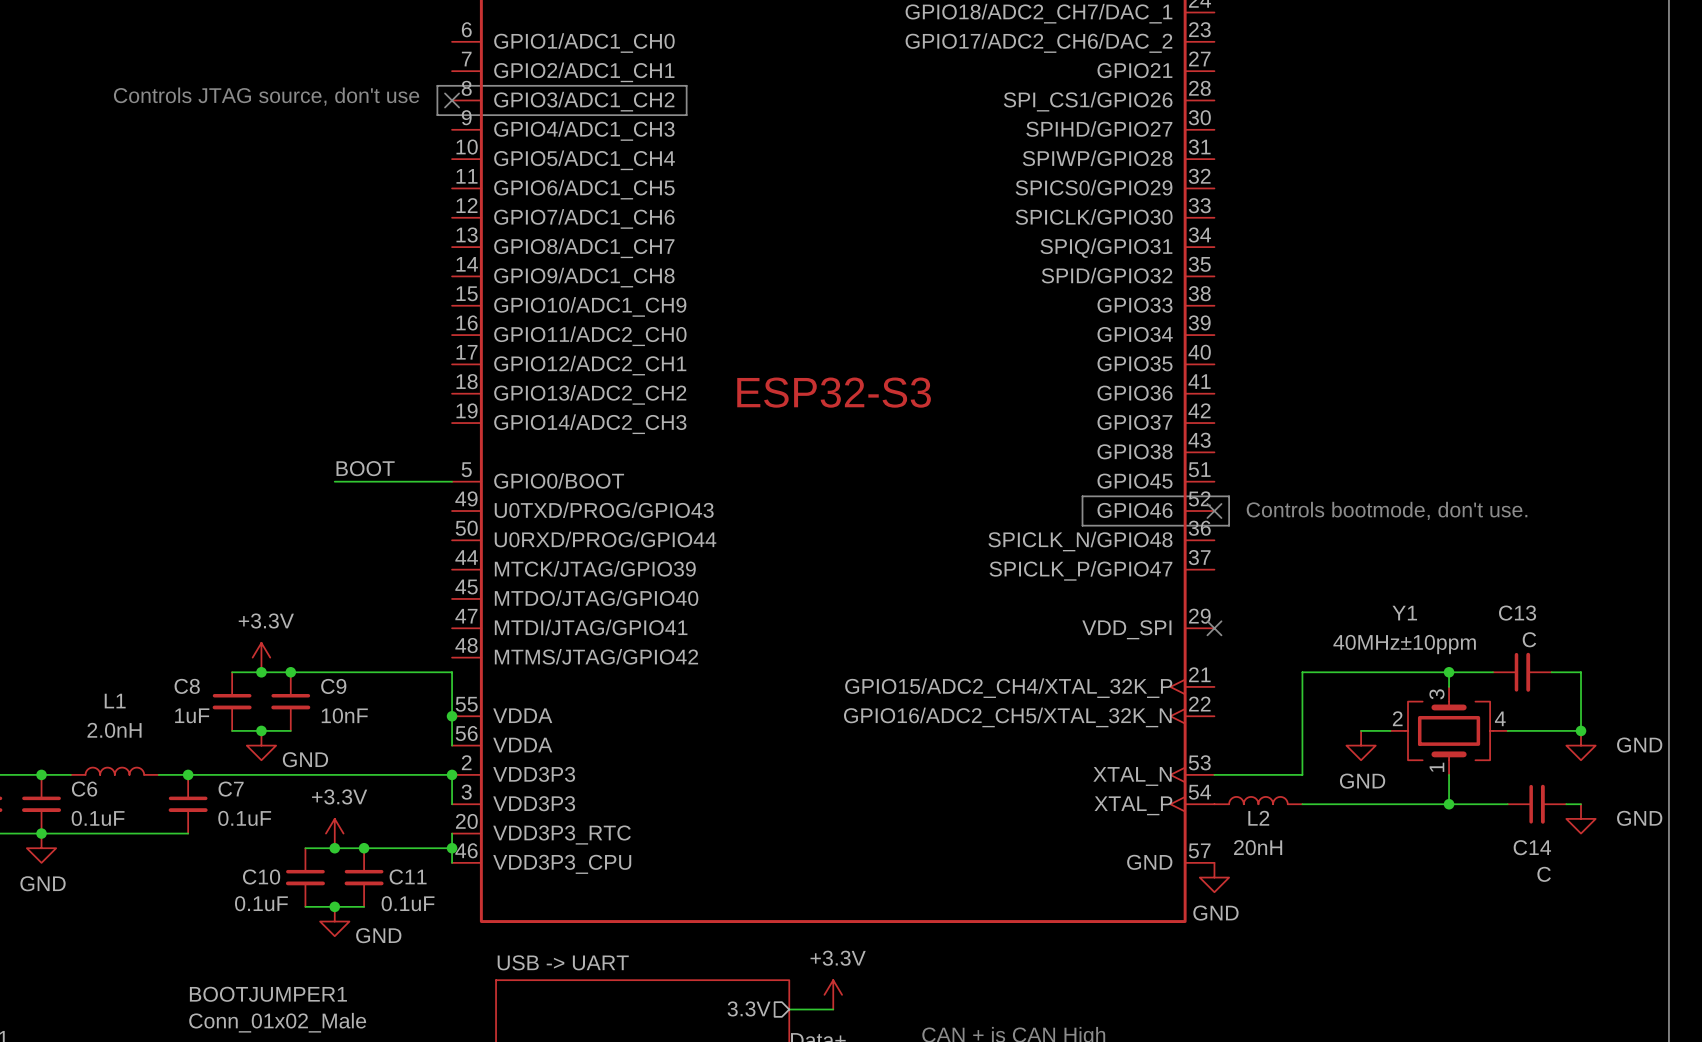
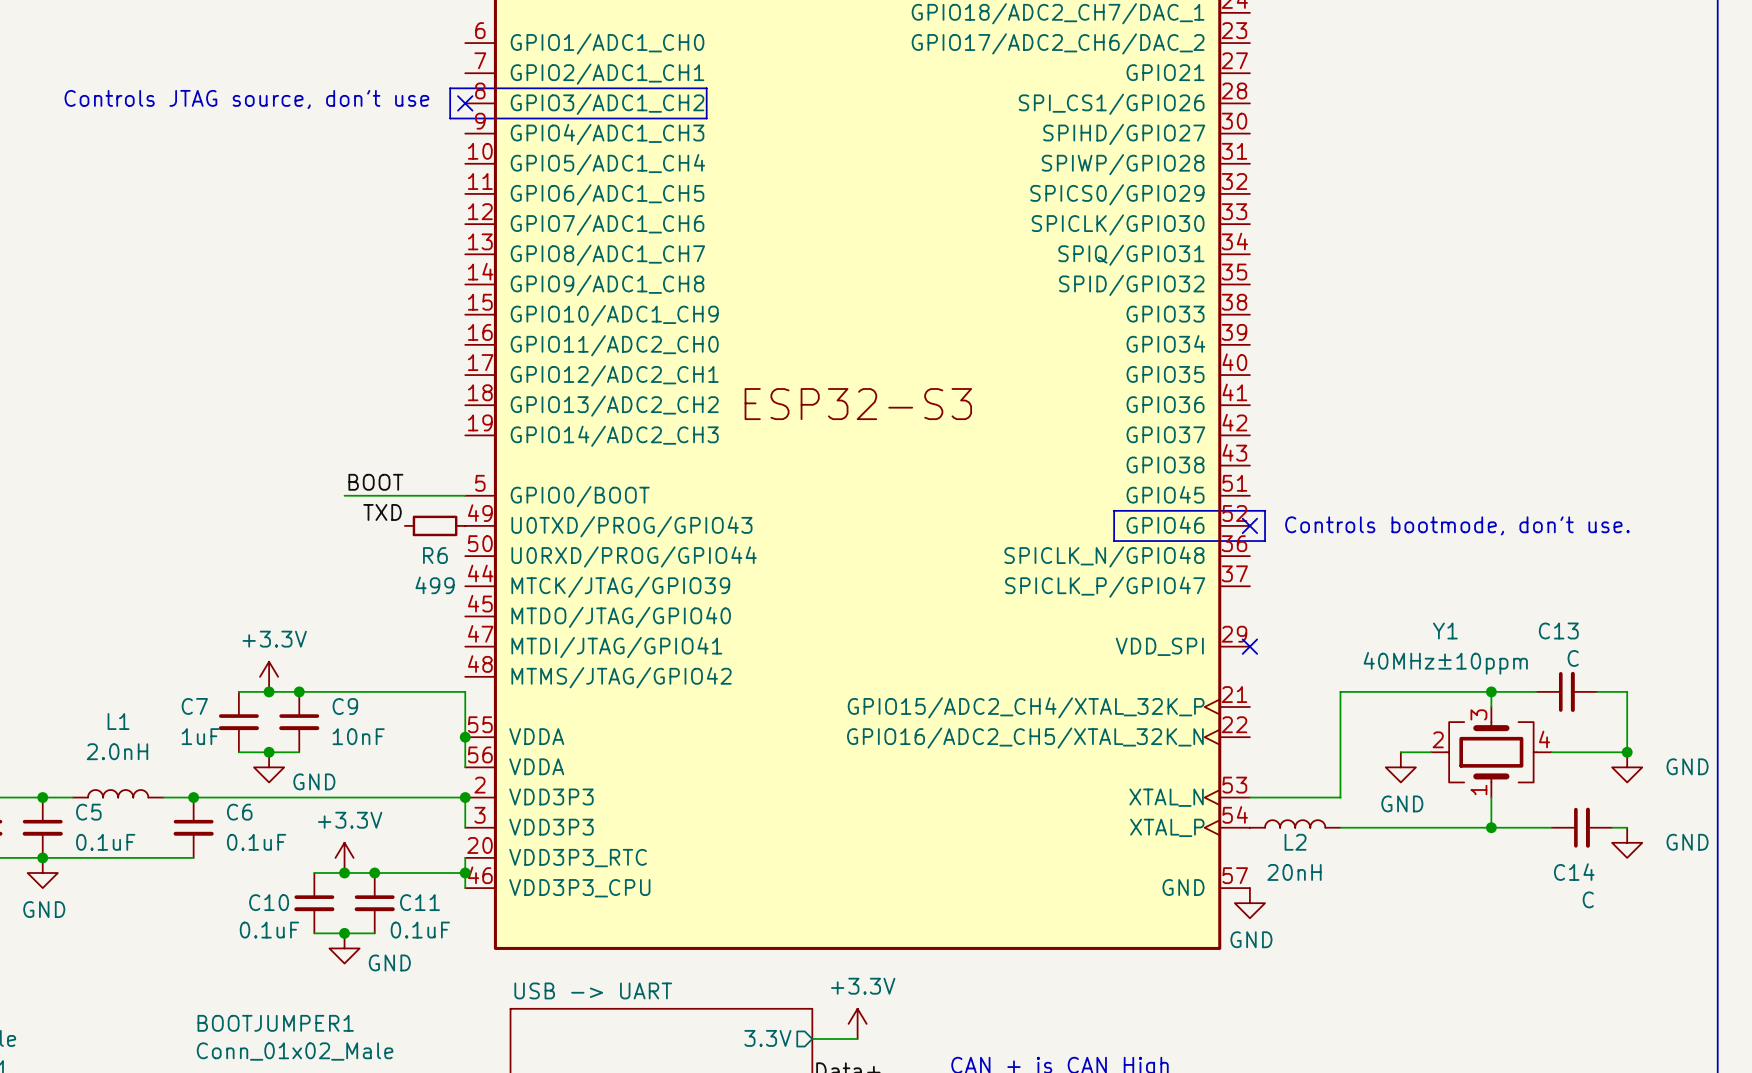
label: none -> TXD (382, 512)
R6: none -> 499 (435, 525)
C8 name: C8 (187, 686) -> C7 (194, 706)
C6 name: C6 (84, 789) -> C5 (88, 812)
C7 name: C7 (231, 789) -> C6 (239, 812)

